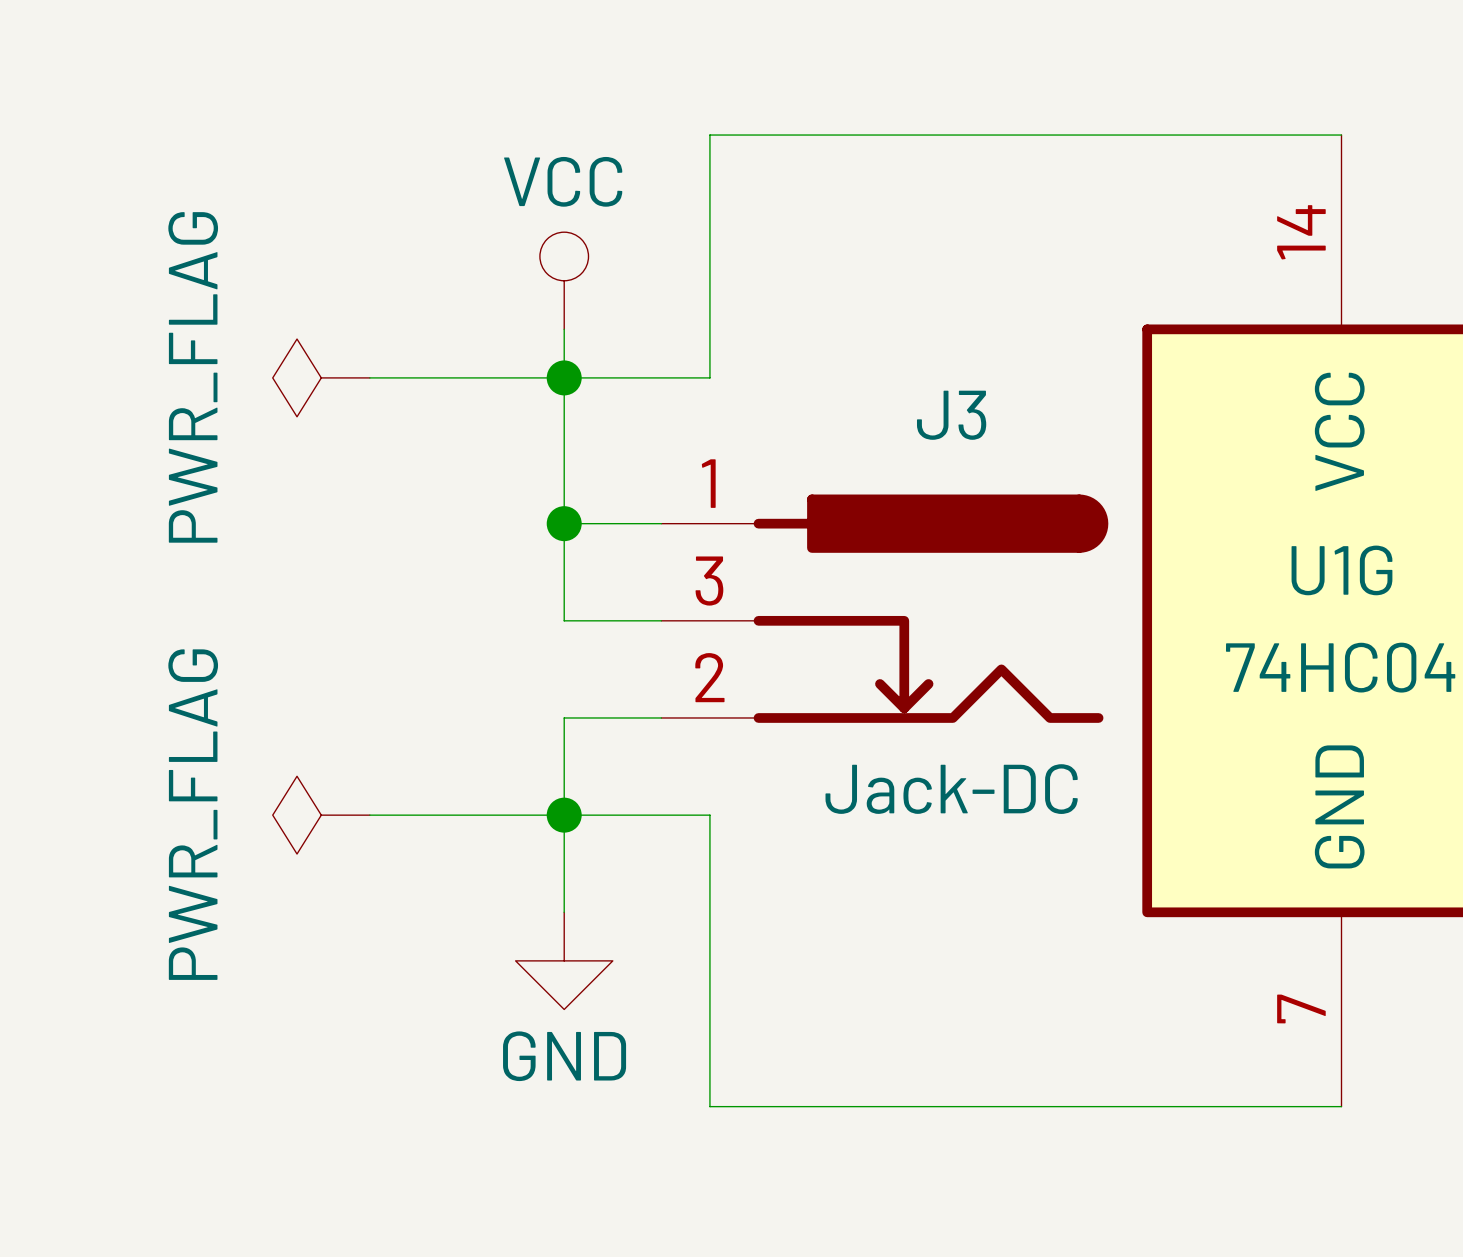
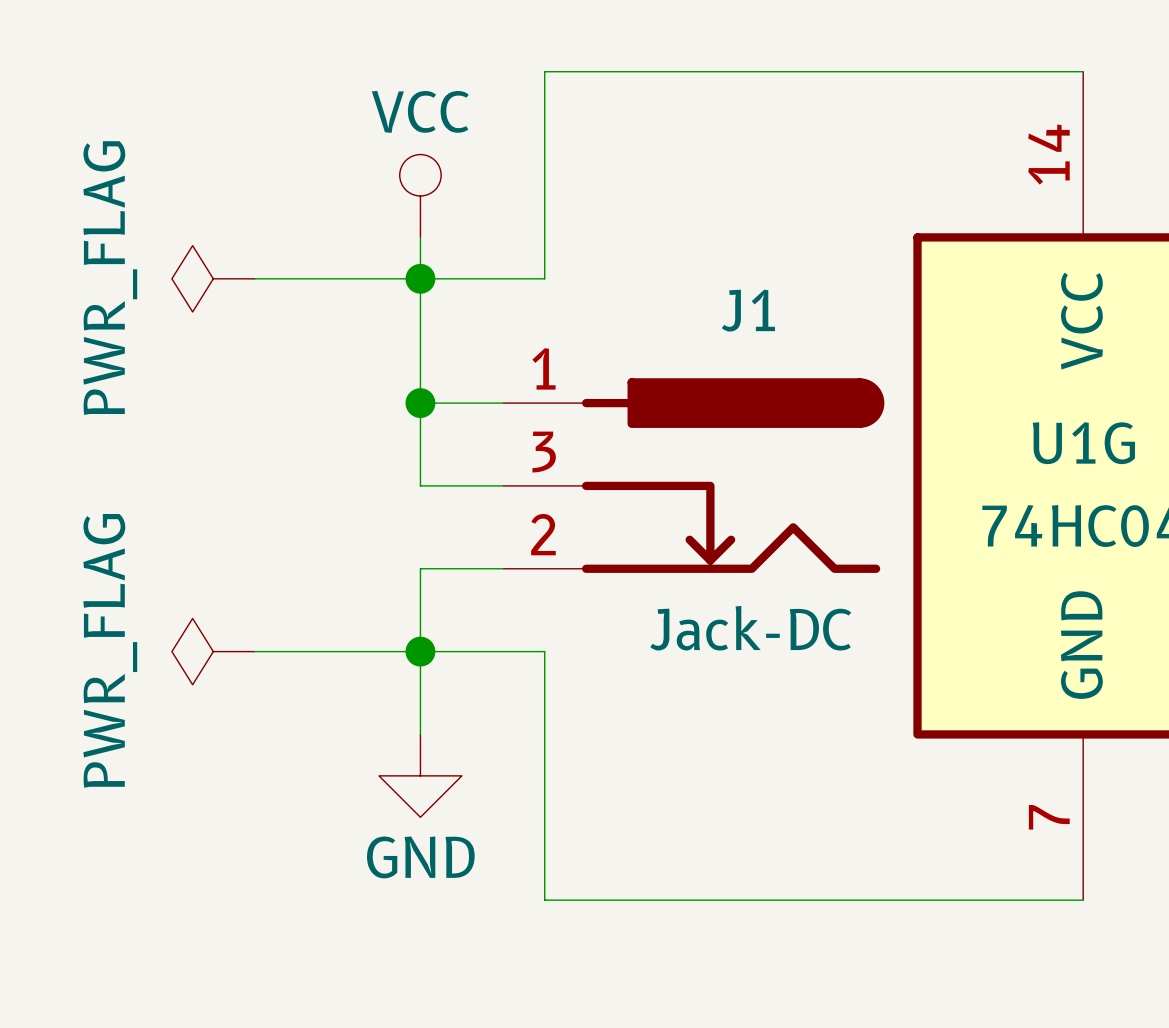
J3 name: J3 (951, 415) -> J1 (748, 310)

